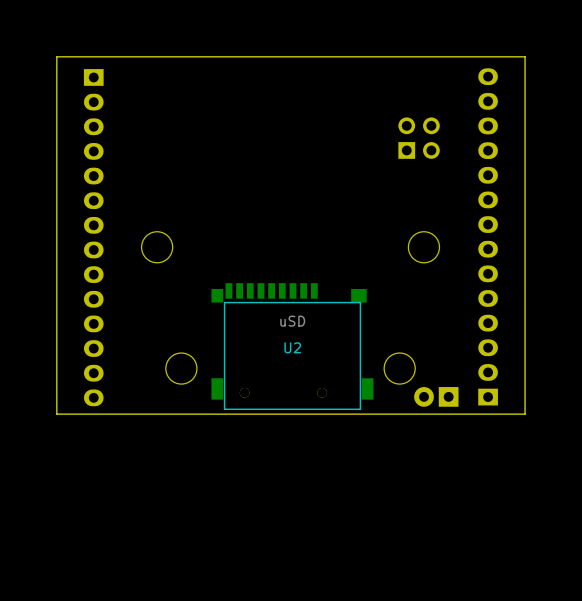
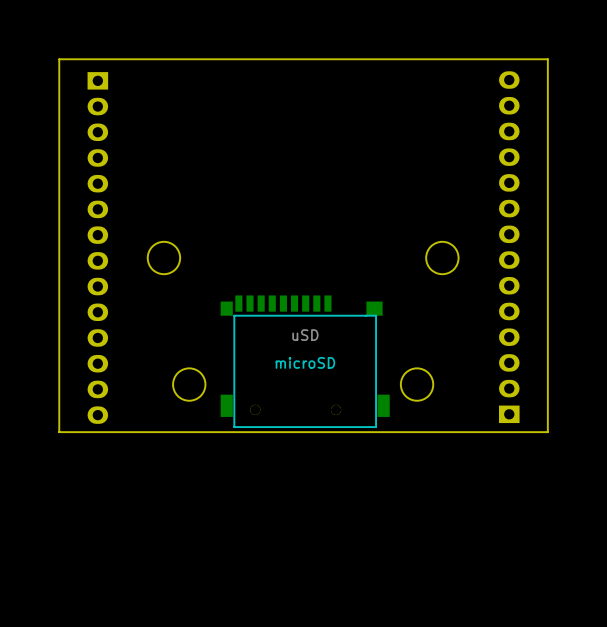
part: (419, 138) -> none
U2 name: U2 (292, 347) -> microSD (305, 362)
part: (436, 396) -> none

